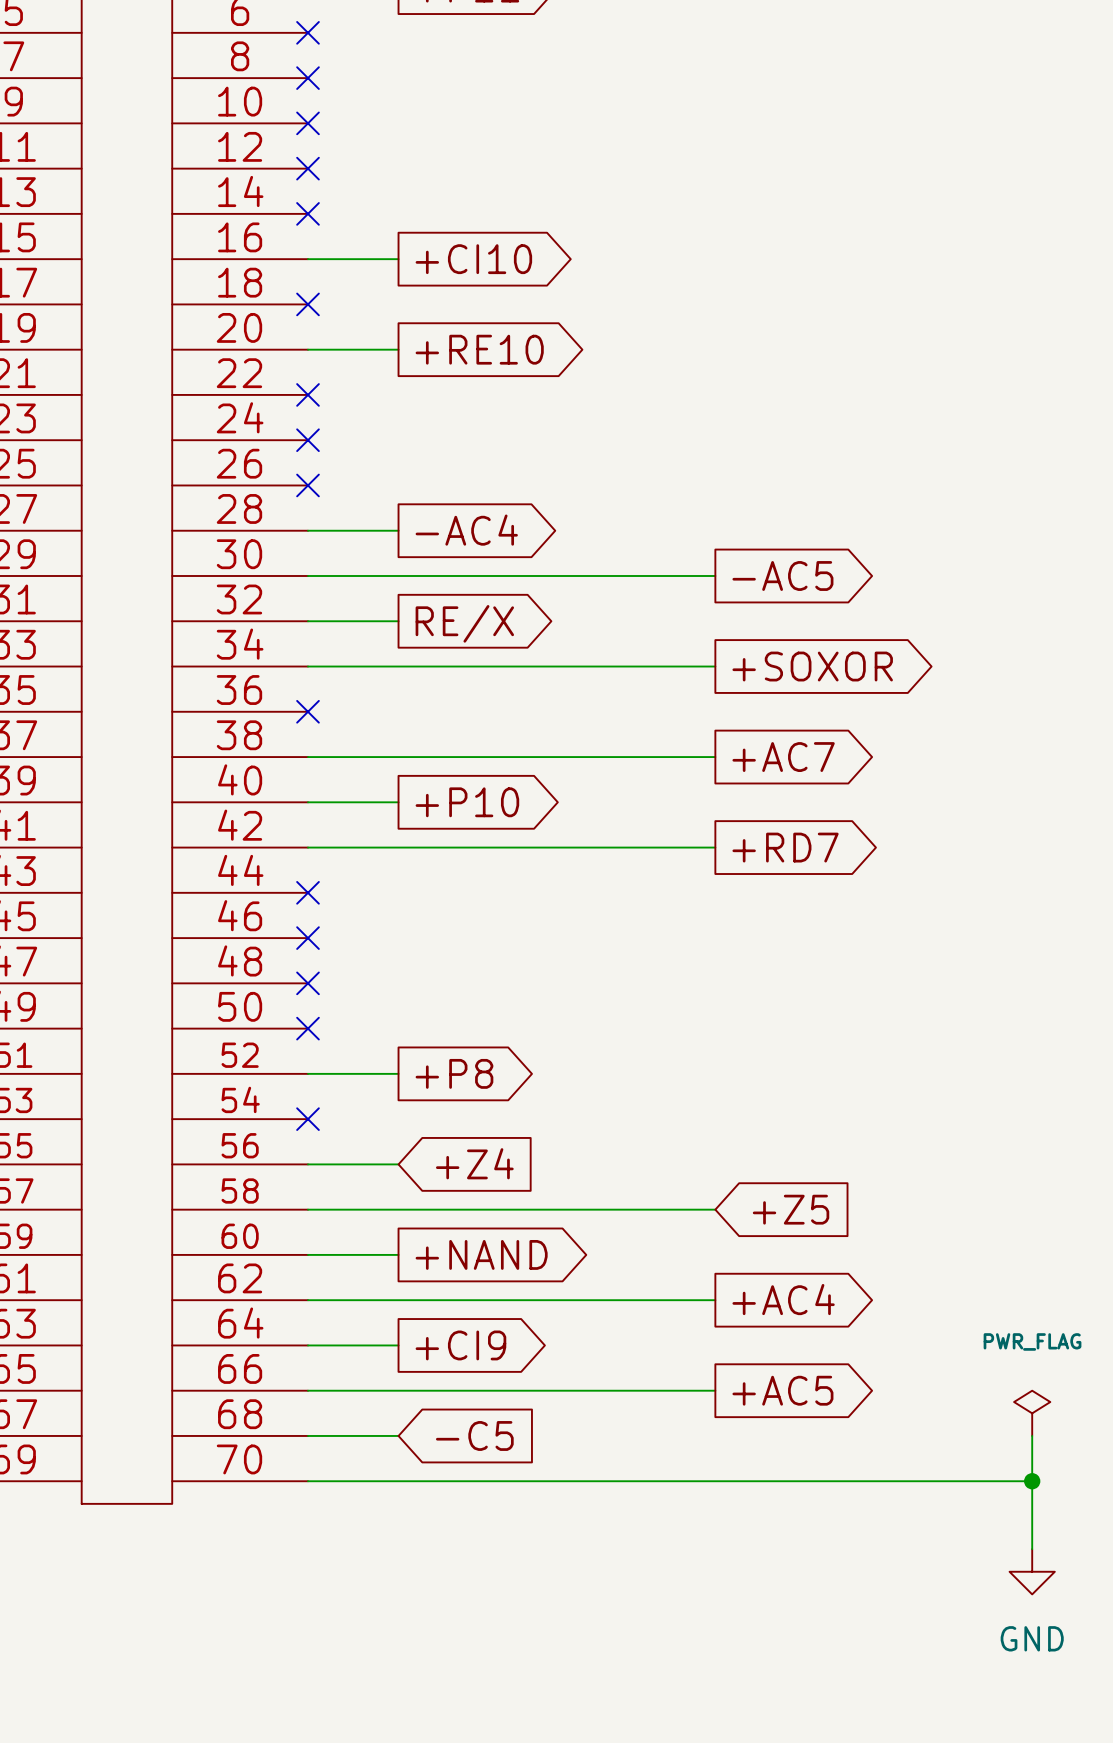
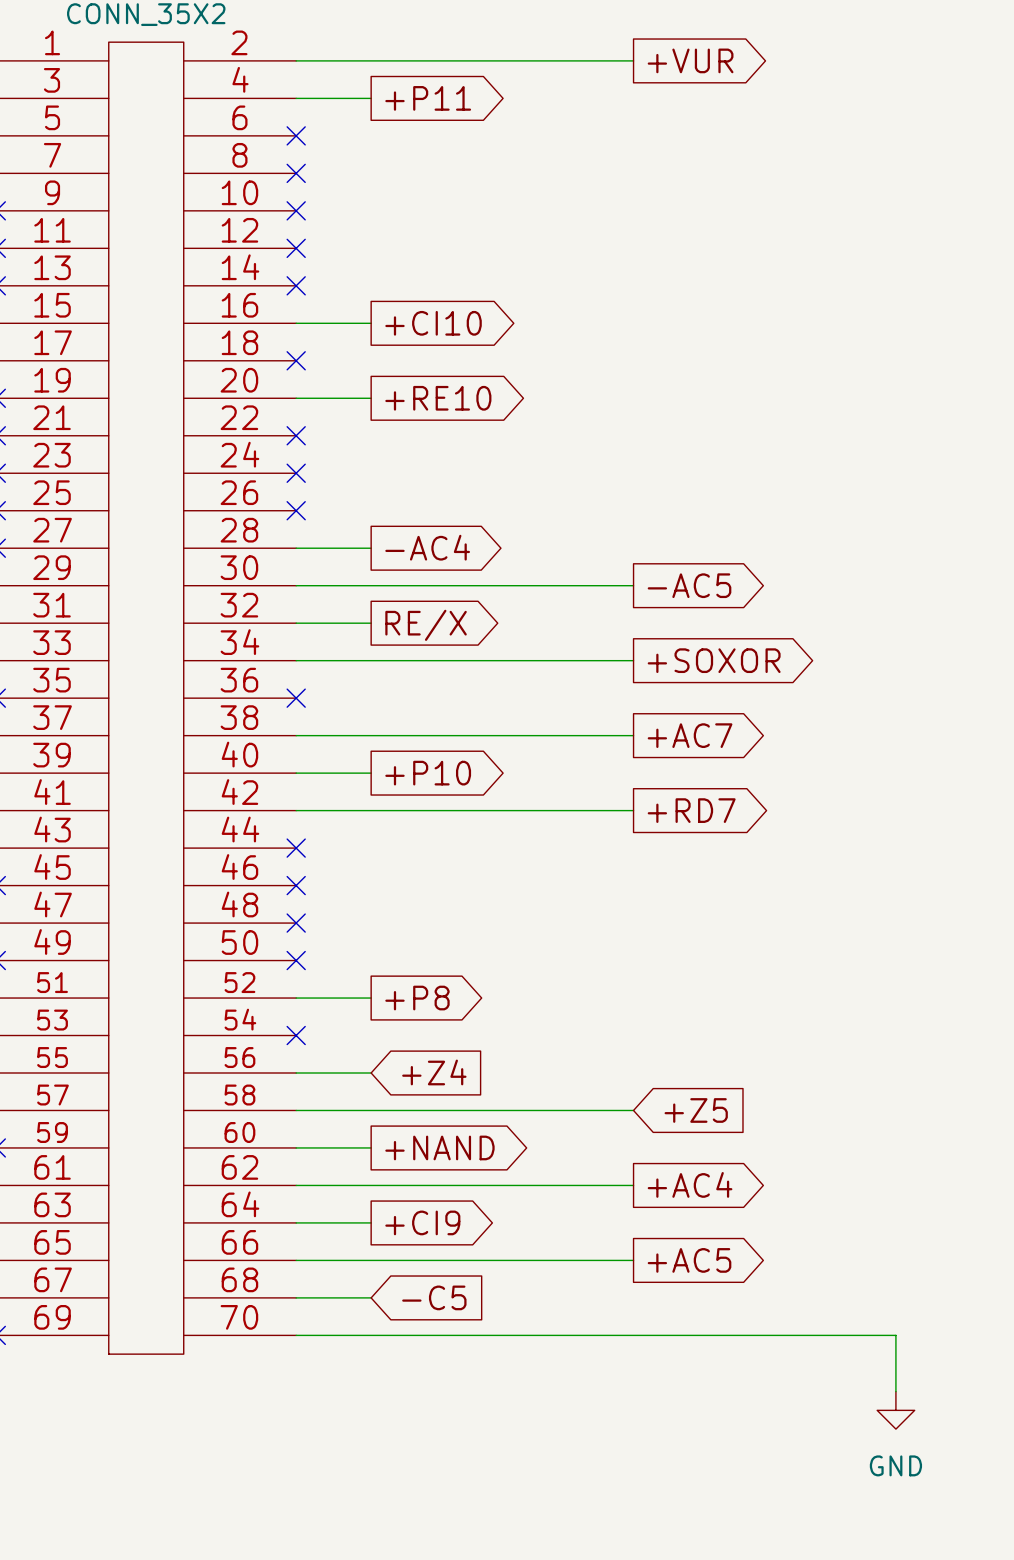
power symbol: PWR_FLAG (1032, 1413) -> none
wire: (1032, 1435) (1032, 1481) -> none
junction: (1032, 1481) -> none

